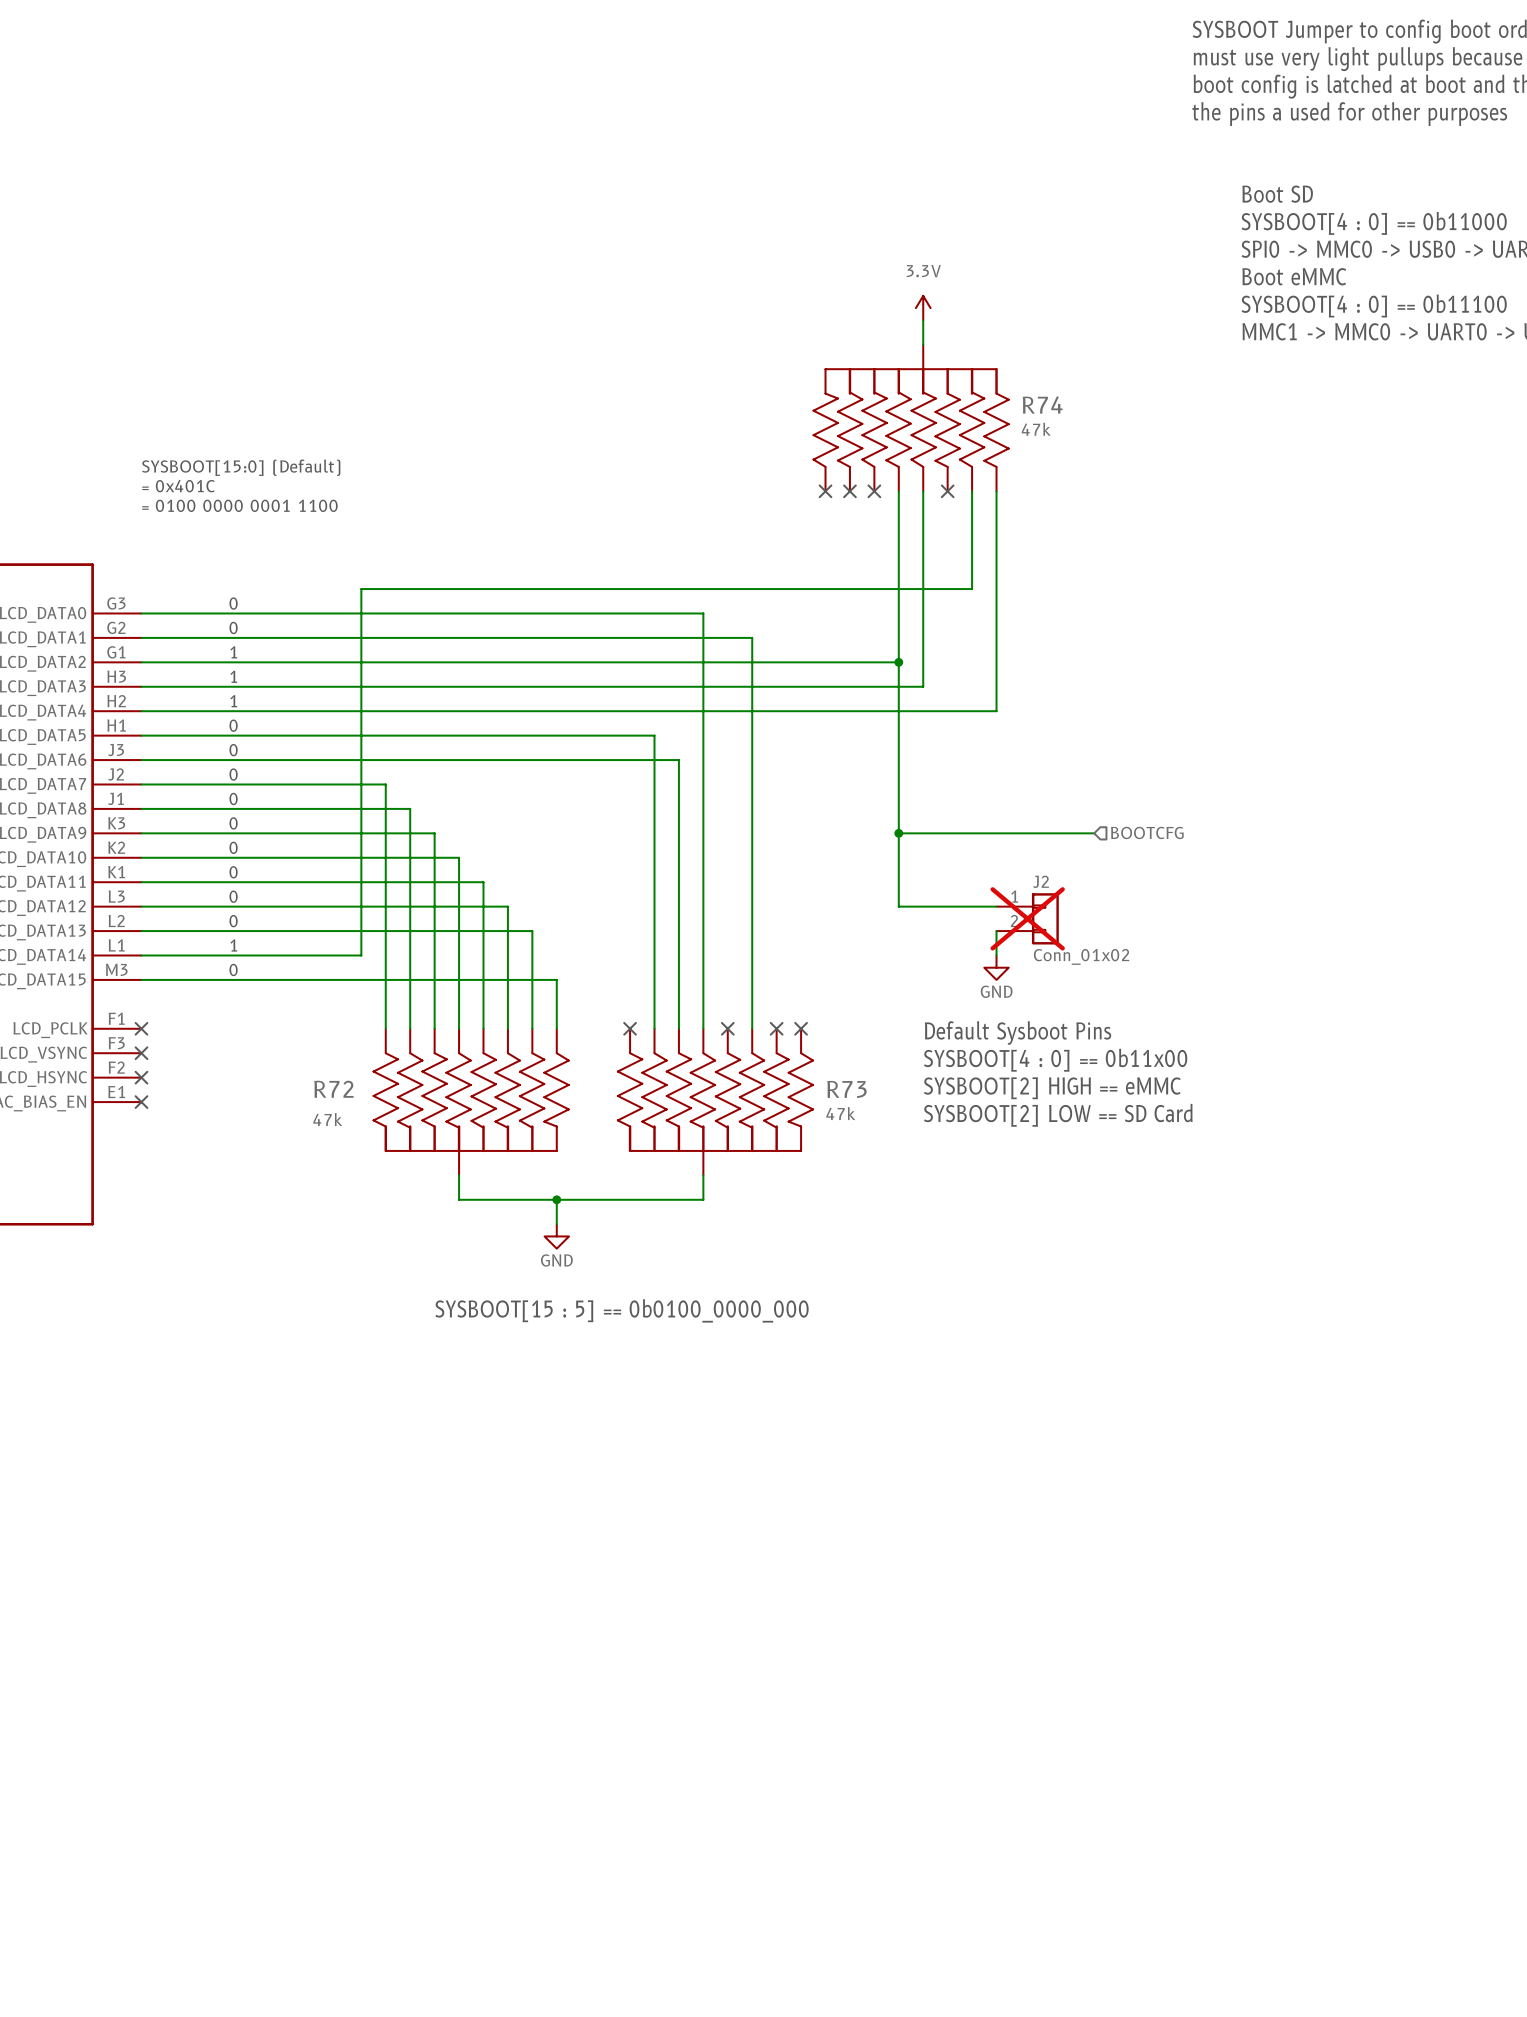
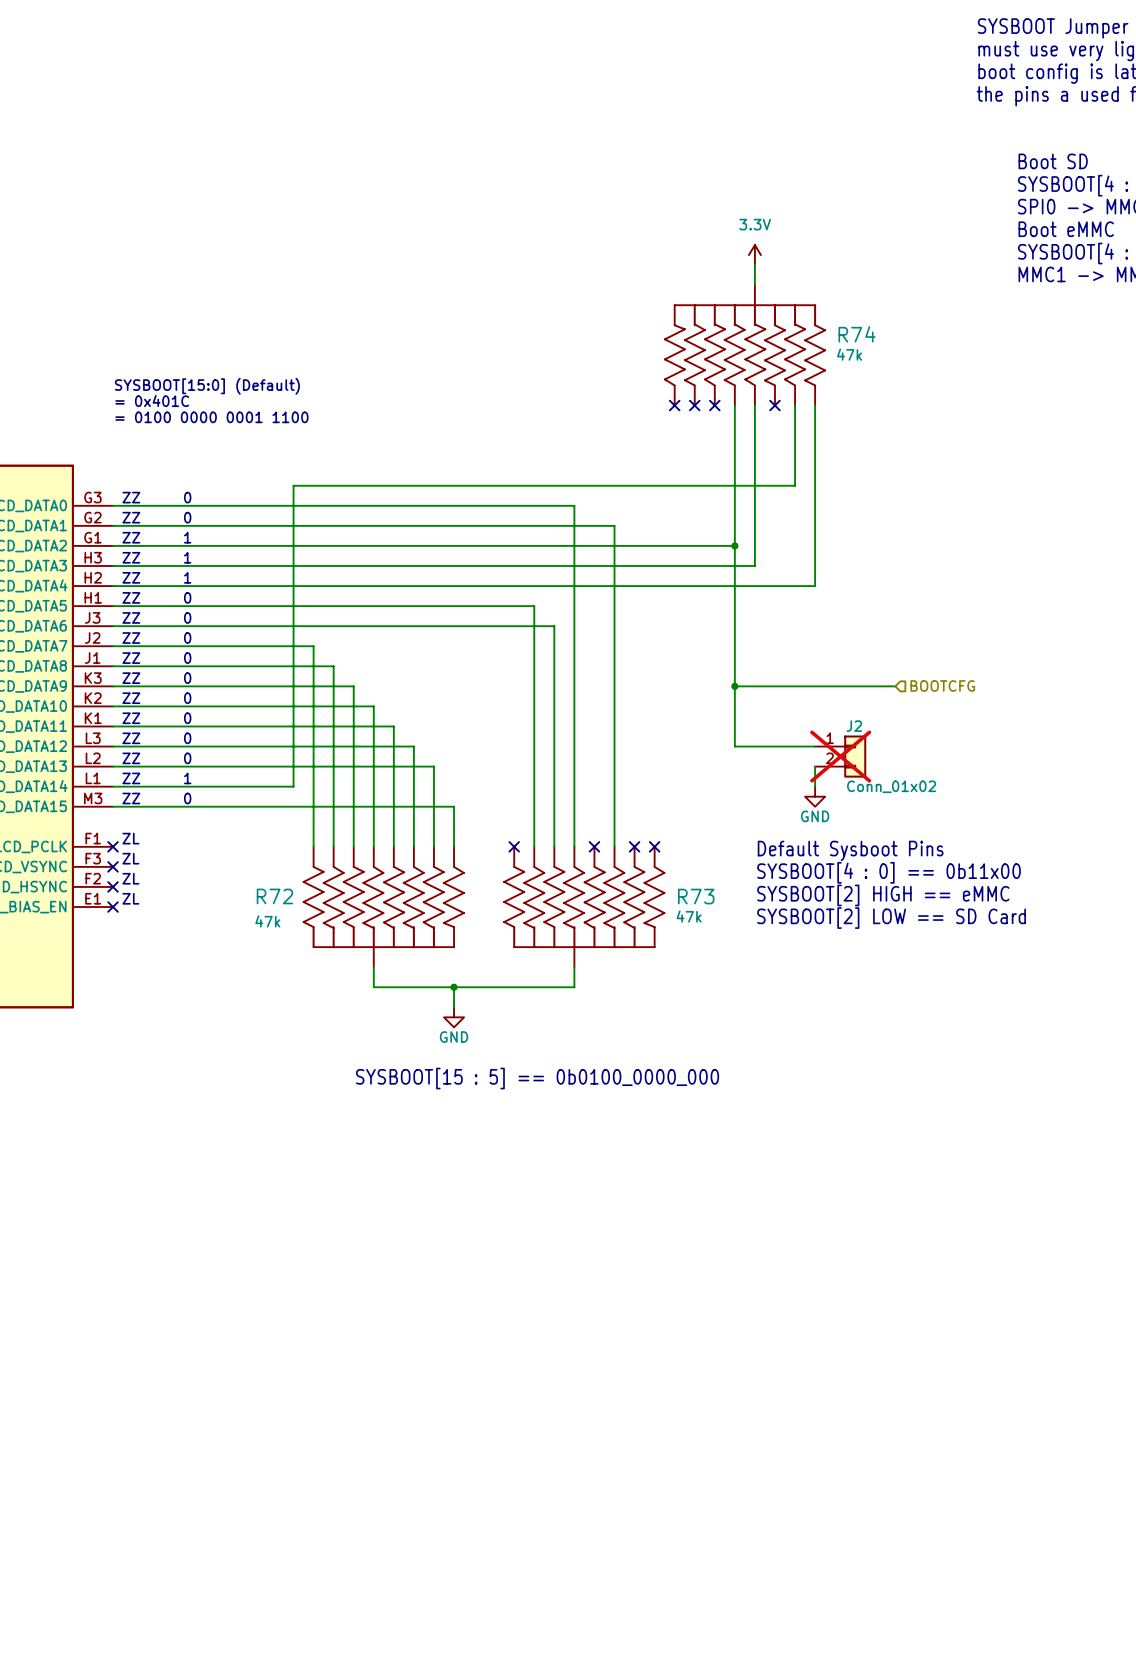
text: none -> ZZ (131, 497)
text: none -> ZZ (131, 517)
text: none -> ZZ (131, 537)
text: none -> ZZ (131, 557)
text: none -> ZZ (131, 577)
text: none -> ZZ (131, 597)
text: none -> ZZ (131, 617)
text: none -> ZZ (131, 638)
text: none -> ZZ (131, 658)
text: none -> ZZ (131, 678)
text: none -> ZZ (131, 698)
text: none -> ZZ (131, 718)
text: none -> ZZ (131, 738)
text: none -> ZZ (131, 758)
text: none -> ZZ (131, 778)
text: none -> ZZ (131, 798)
text: none -> ZL (130, 838)
text: none -> ZL (130, 858)
text: none -> ZL (130, 878)
text: none -> ZL (130, 898)

